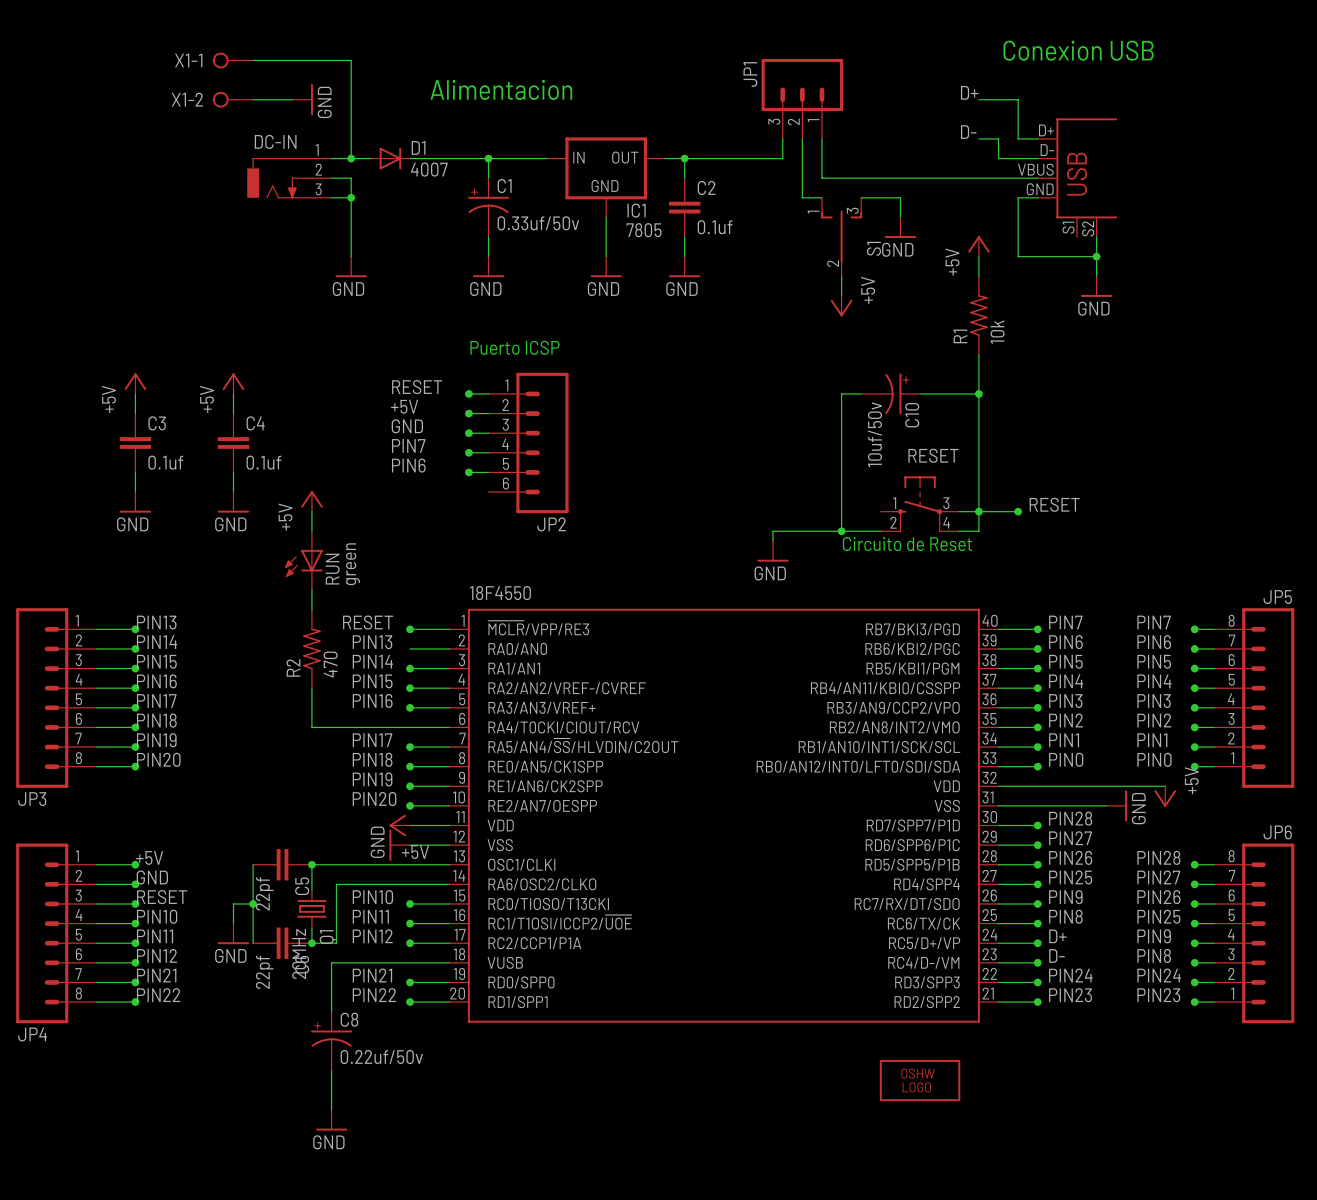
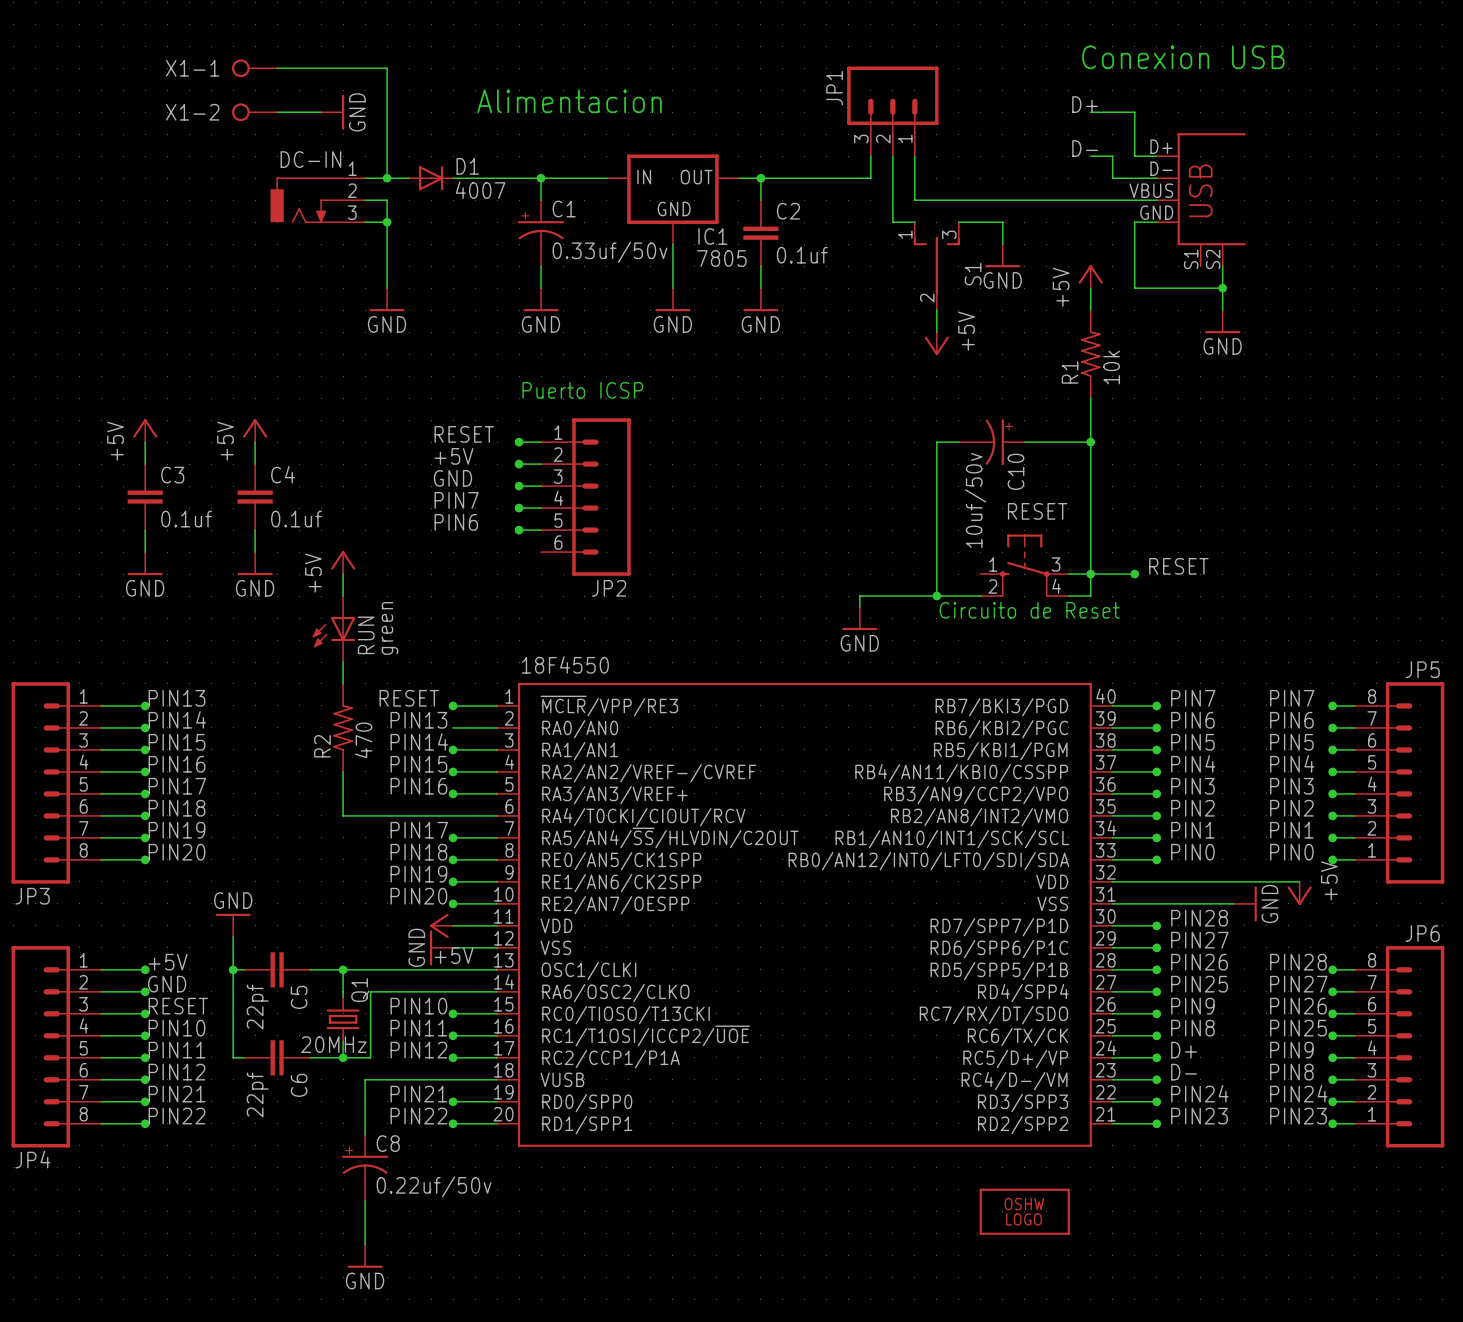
wire: none -> (233, 936) (233, 1057) (244, 1057)
wire: none -> (233, 969) (244, 969)
junction: none -> (233, 969)
wire: (253, 864) (253, 943) -> none
C5 position: (282, 864) -> (277, 969)
wire: (253, 903) (233, 903) (233, 923) -> none
junction: (253, 903) -> none
power symbol position: GND (233, 933) -> GND (233, 925)
Q1 name position: Q1 (327, 936) -> Q1 (360, 990)
power symbol rotation: 0° (233, 943) -> 180° (233, 914)
C6 position: (282, 943) -> (277, 1057)
Q1 value rotation: 0° (299, 954) -> 90° clockwise (333, 1044)

